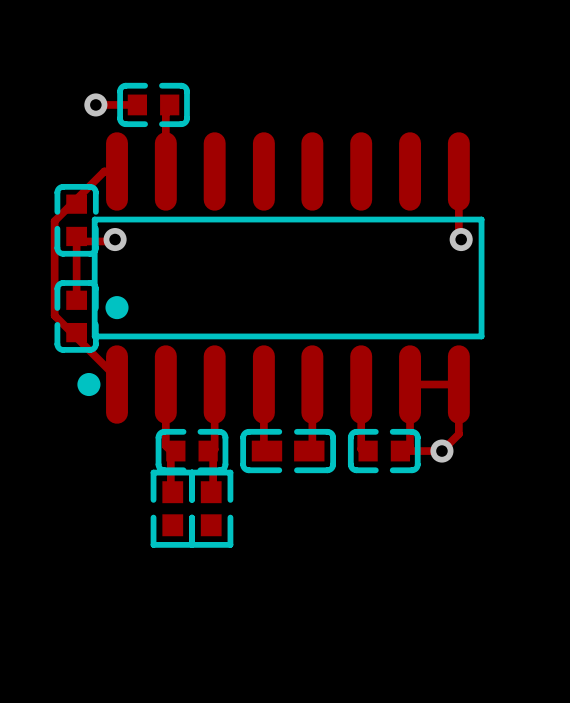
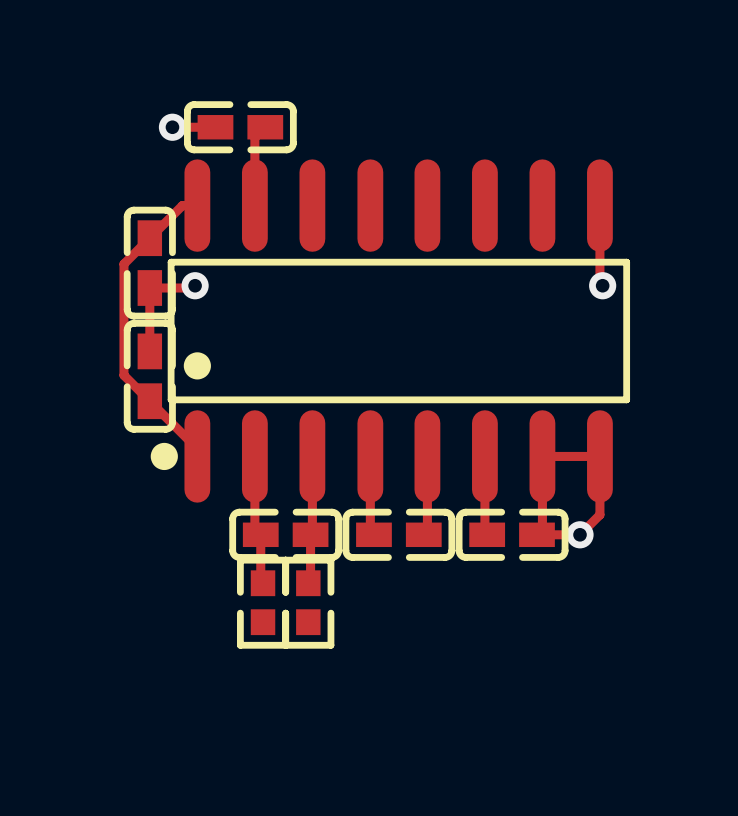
part footprint: [117, 82, 190, 128] -> [184, 101, 297, 154]
part footprint: [54, 183, 99, 257] -> [123, 206, 176, 320]
part footprint: [54, 280, 99, 353] -> [123, 319, 176, 433]
part footprint: [155, 428, 229, 474] -> [229, 508, 343, 561]
part footprint: [347, 428, 421, 474] -> [455, 508, 569, 561]

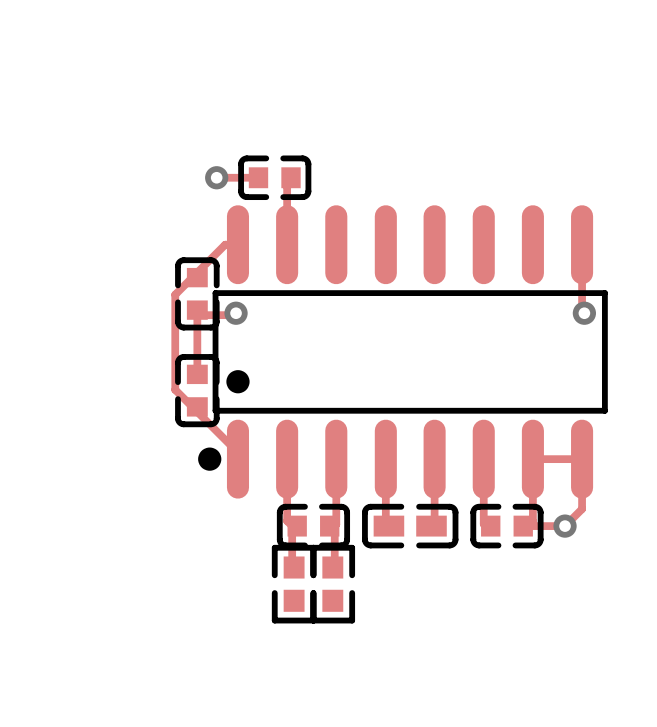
part footprint: [184, 101, 297, 154] -> [238, 155, 312, 201]
part footprint: [123, 206, 176, 320] -> [175, 257, 220, 331]
part footprint: [123, 319, 176, 433] -> [175, 354, 220, 428]
part footprint: [229, 508, 343, 561] -> [276, 503, 351, 549]
part footprint: [455, 508, 569, 561] -> [470, 503, 544, 549]

